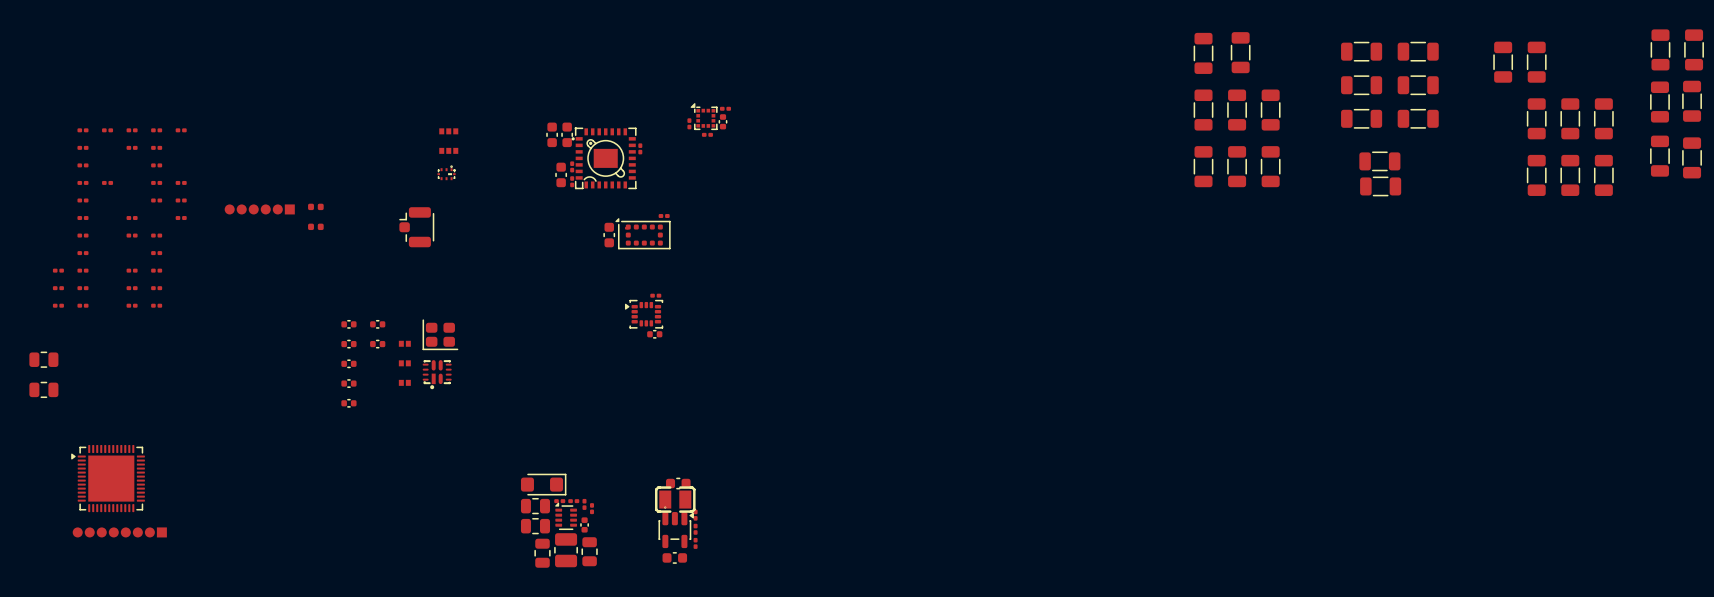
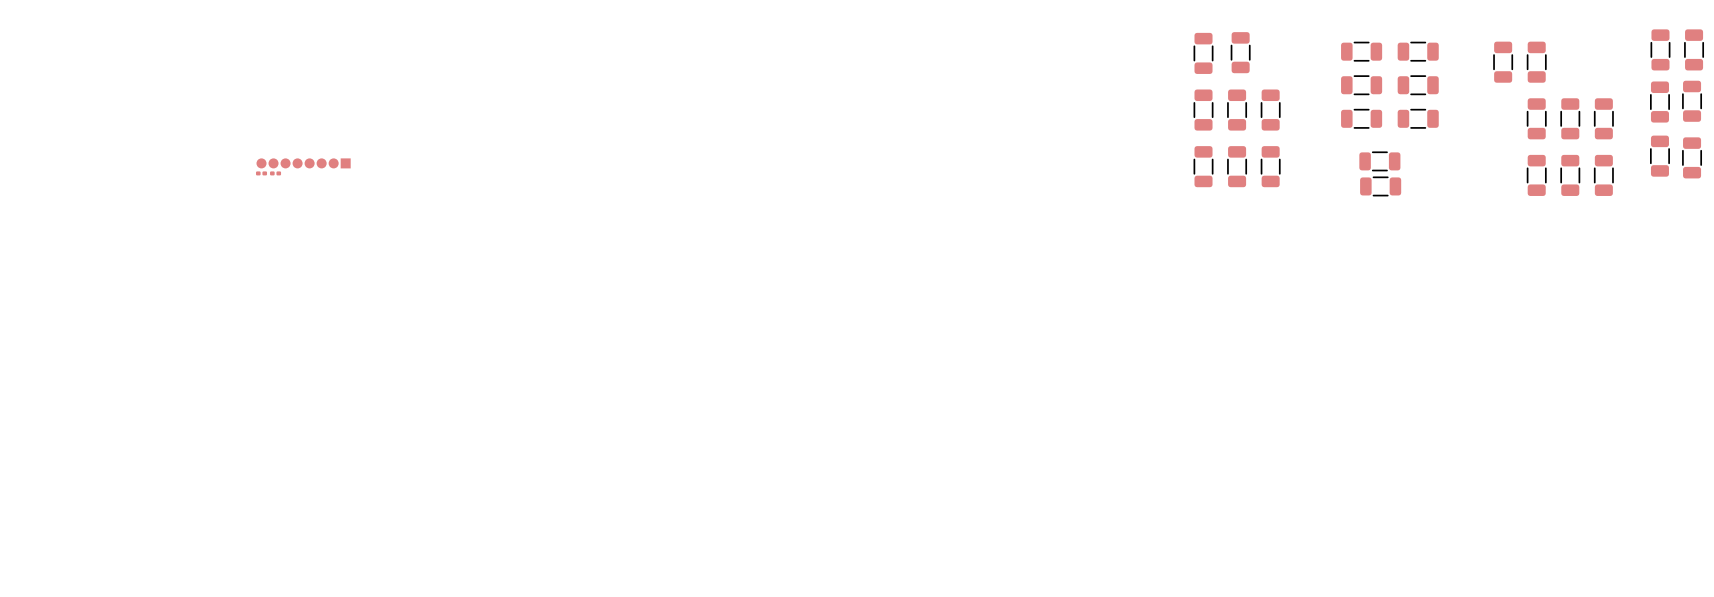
part: (725, 108) -> none
part: (704, 116) -> none
part: (722, 121) -> none
part: (689, 123) -> none
part: (82, 130) -> none
part: (107, 130) -> none
part: (132, 130) -> none
part: (156, 130) -> none
part: (181, 130) -> none
part: (448, 131) -> none
part: (552, 134) -> none
part: (567, 134) -> none
part: (707, 134) -> none
part: (82, 147) -> none
part: (132, 147) -> none
part: (156, 147) -> none
part: (640, 148) -> none
part: (448, 150) -> none
part: (604, 158) -> none
part: none -> (303, 163)
part: (82, 165) -> none
part: (156, 165) -> none
part: (572, 166) -> none
part: (446, 172) -> none
part: none -> (261, 173)
part: none -> (275, 173)
part: (561, 174) -> none
part: (572, 181) -> none
part: (82, 182) -> none
part: (107, 182) -> none
part: (156, 182) -> none
part: (181, 182) -> none
part: (82, 200) -> none
part: (156, 200) -> none
part: (181, 200) -> none
part: (315, 206) -> none
part: (259, 209) -> none
part: (664, 216) -> none
part: (82, 218) -> none
part: (132, 218) -> none
part: (181, 218) -> none
part: (315, 226) -> none
part: (416, 227) -> none
part: (642, 233) -> none
part: (82, 235) -> none
part: (132, 235) -> none
part: (156, 235) -> none
part: (609, 235) -> none
part: (82, 253) -> none
part: (156, 253) -> none
part: (58, 270) -> none
part: (82, 270) -> none
part: (132, 270) -> none
part: (156, 270) -> none
part: (58, 288) -> none
part: (82, 288) -> none
part: (132, 288) -> none
part: (156, 288) -> none
part: (655, 295) -> none
part: (58, 305) -> none
part: (82, 305) -> none
part: (132, 305) -> none
part: (156, 305) -> none
part: (644, 314) -> none
part: (348, 324) -> none
part: (377, 324) -> none
part: (440, 334) -> none
part: (654, 334) -> none
part: (404, 343) -> none
part: (348, 344) -> none
part: (377, 344) -> none
part: (43, 359) -> none
part: (348, 363) -> none
part: (404, 363) -> none
part: (437, 374) -> none
part: (404, 382) -> none
part: (348, 383) -> none
part: (43, 389) -> none
part: (348, 403) -> none
part: (108, 478) -> none
part: (678, 483) -> none
part: (543, 484) -> none
part: (675, 499) -> none
part: (559, 501) -> none
part: (573, 501) -> none
part: (584, 504) -> none
part: (535, 506) -> none
part: (592, 508) -> none
part: (695, 515) -> none
part: (566, 516) -> none
part: (584, 524) -> none
part: (535, 526) -> none
part: (695, 529) -> none
part: (676, 530) -> none
part: (119, 532) -> none
part: (695, 543) -> none
part: (566, 550) -> none
part: (589, 551) -> none
part: (542, 553) -> none
part: (674, 557) -> none

